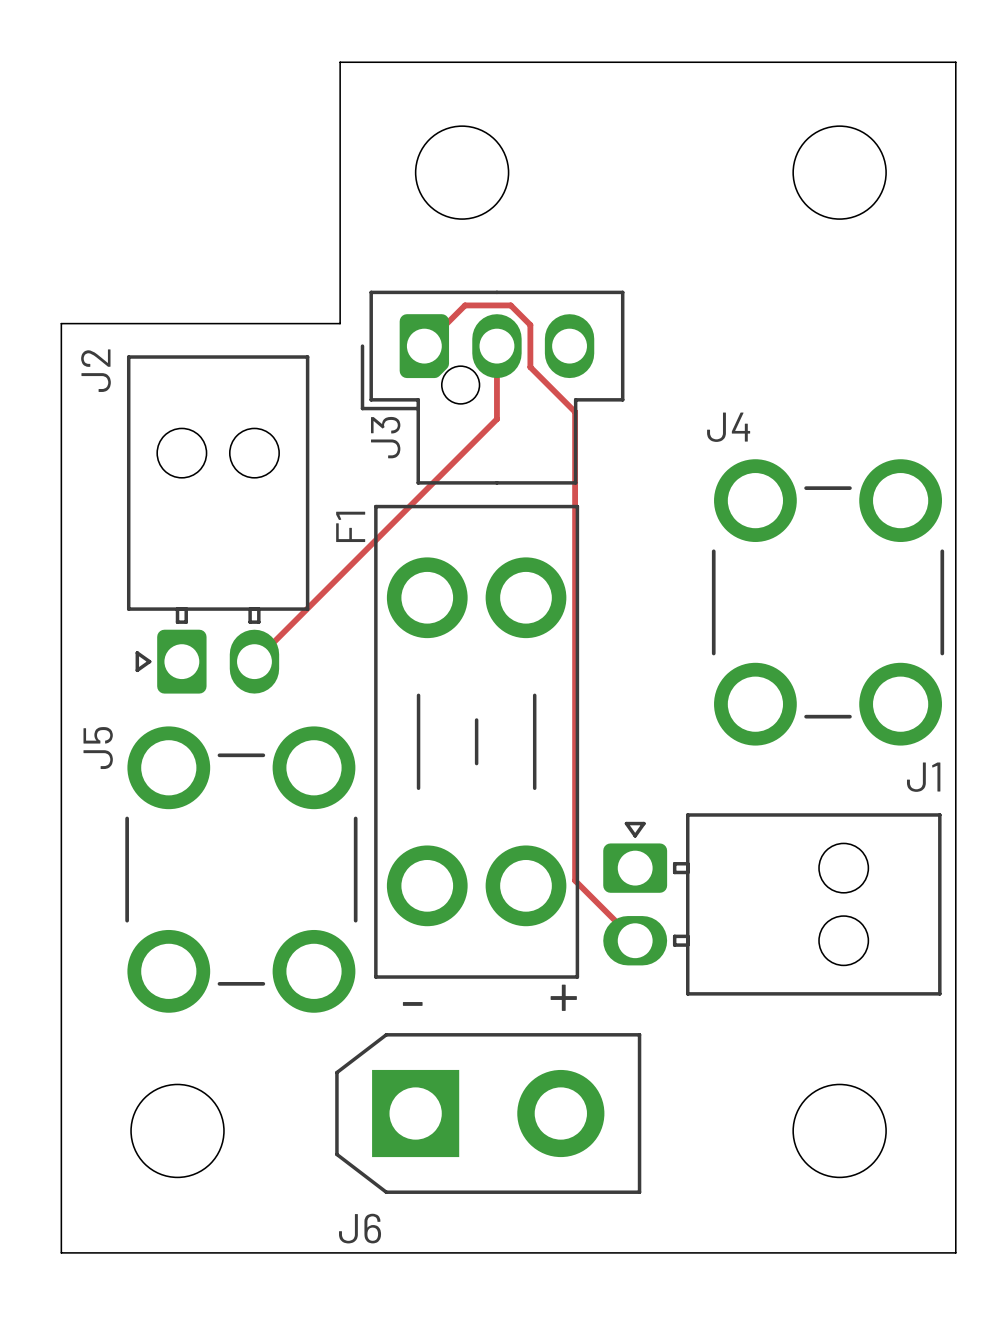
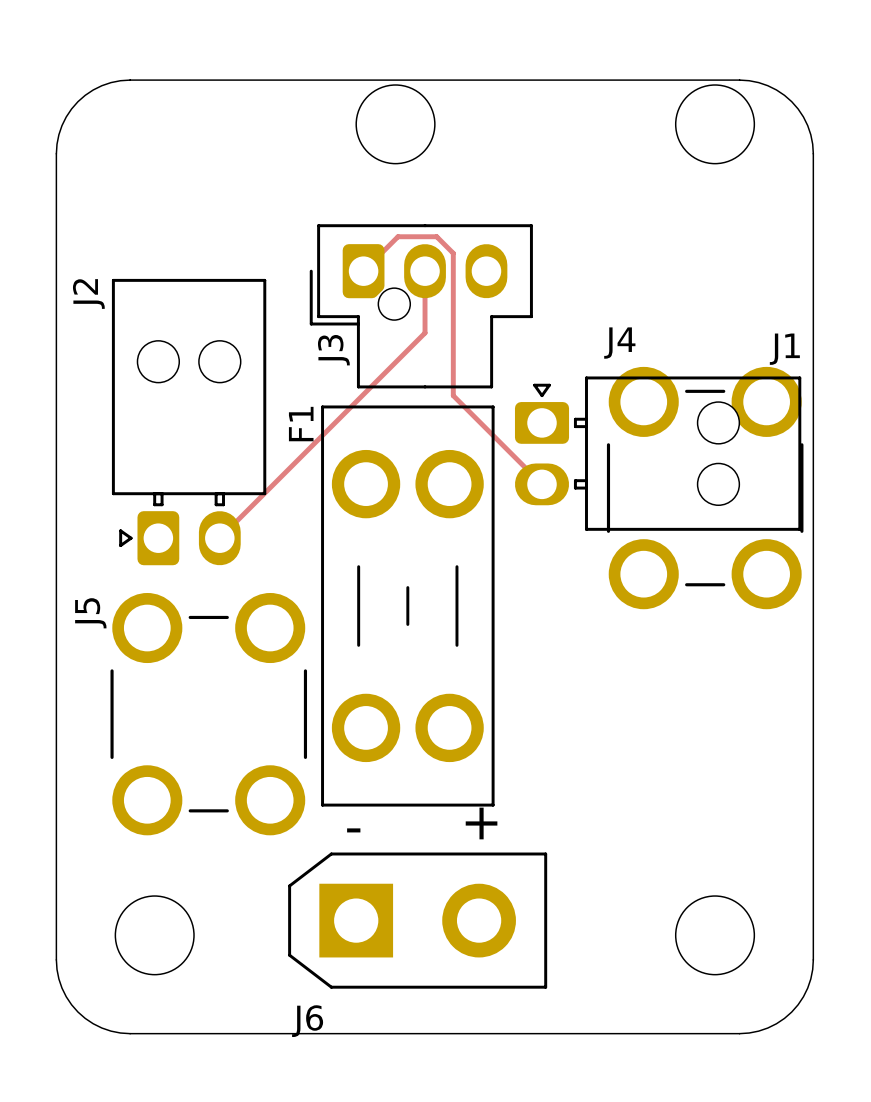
board edge: (955, 207) (955, 62) (340, 62) (340, 323) (61, 323) -> (813, 153) (807, 125) (791, 101) (767, 85) (749, 80) (120, 80) (101, 85) (85, 95) (71, 108) (61, 125) (56, 153) (56, 252)
top track: (530, 367) (575, 411) (575, 880) (635, 940) -> (453, 289) (453, 395) (542, 484)
J1 position: (772, 904) -> (658, 453)
board edge: (61, 1159) (61, 1252) (955, 1252) (955, 1159) -> (56, 959) (61, 988) (77, 1012) (101, 1028) (130, 1033) (749, 1033) (767, 1028) (791, 1012) (807, 988) (813, 959)

